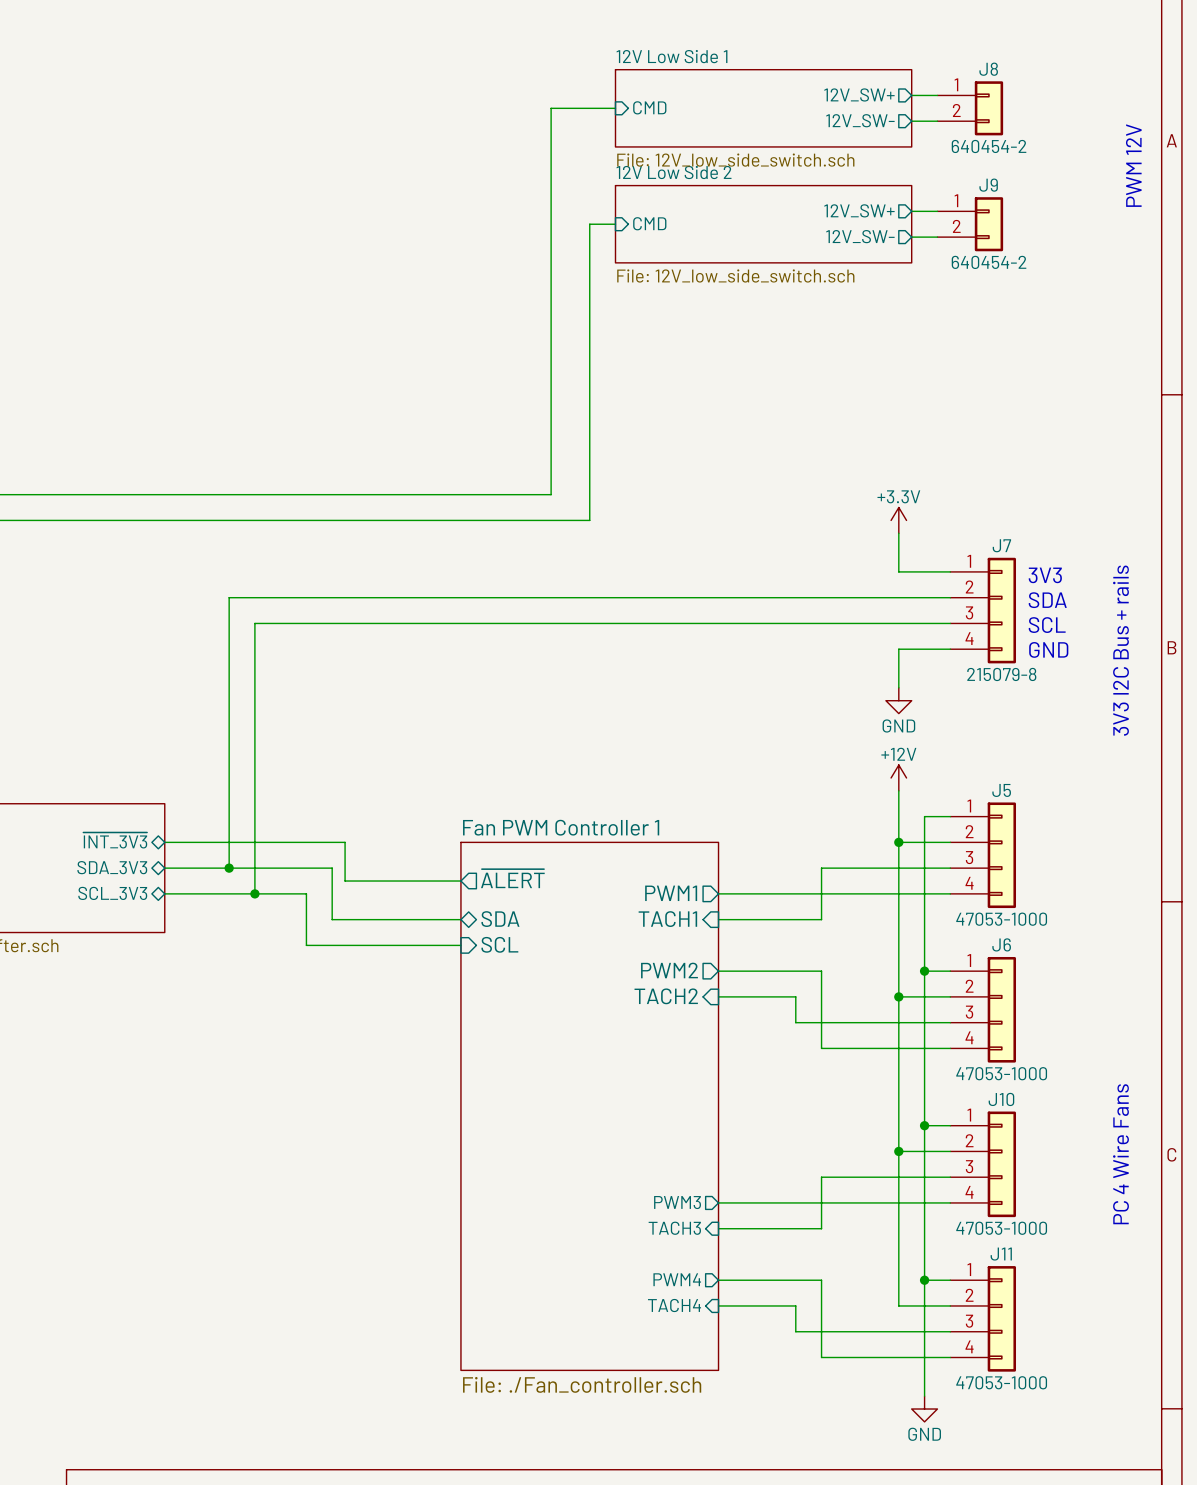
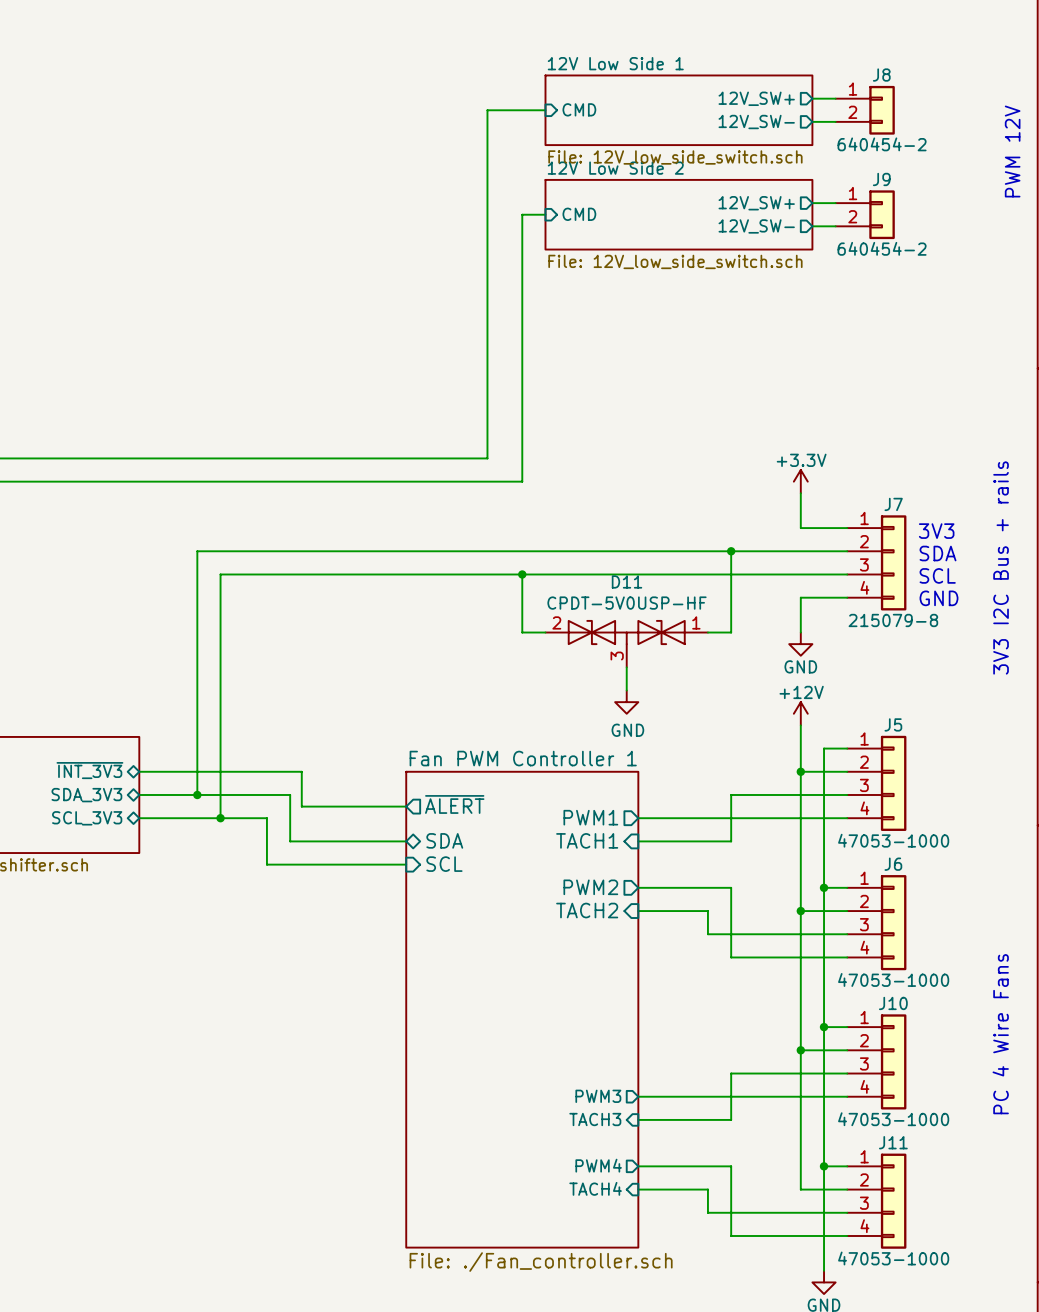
wire: none -> (731, 551) (731, 632) (707, 632)
junction: none -> (731, 551)
wire: none -> (522, 574) (522, 632) (545, 632)
junction: none -> (522, 574)
D11: none -> CPDT-5V0USP-HF (626, 643)
wire: none -> (626, 667) (626, 690)
power symbol: none -> GND (626, 702)

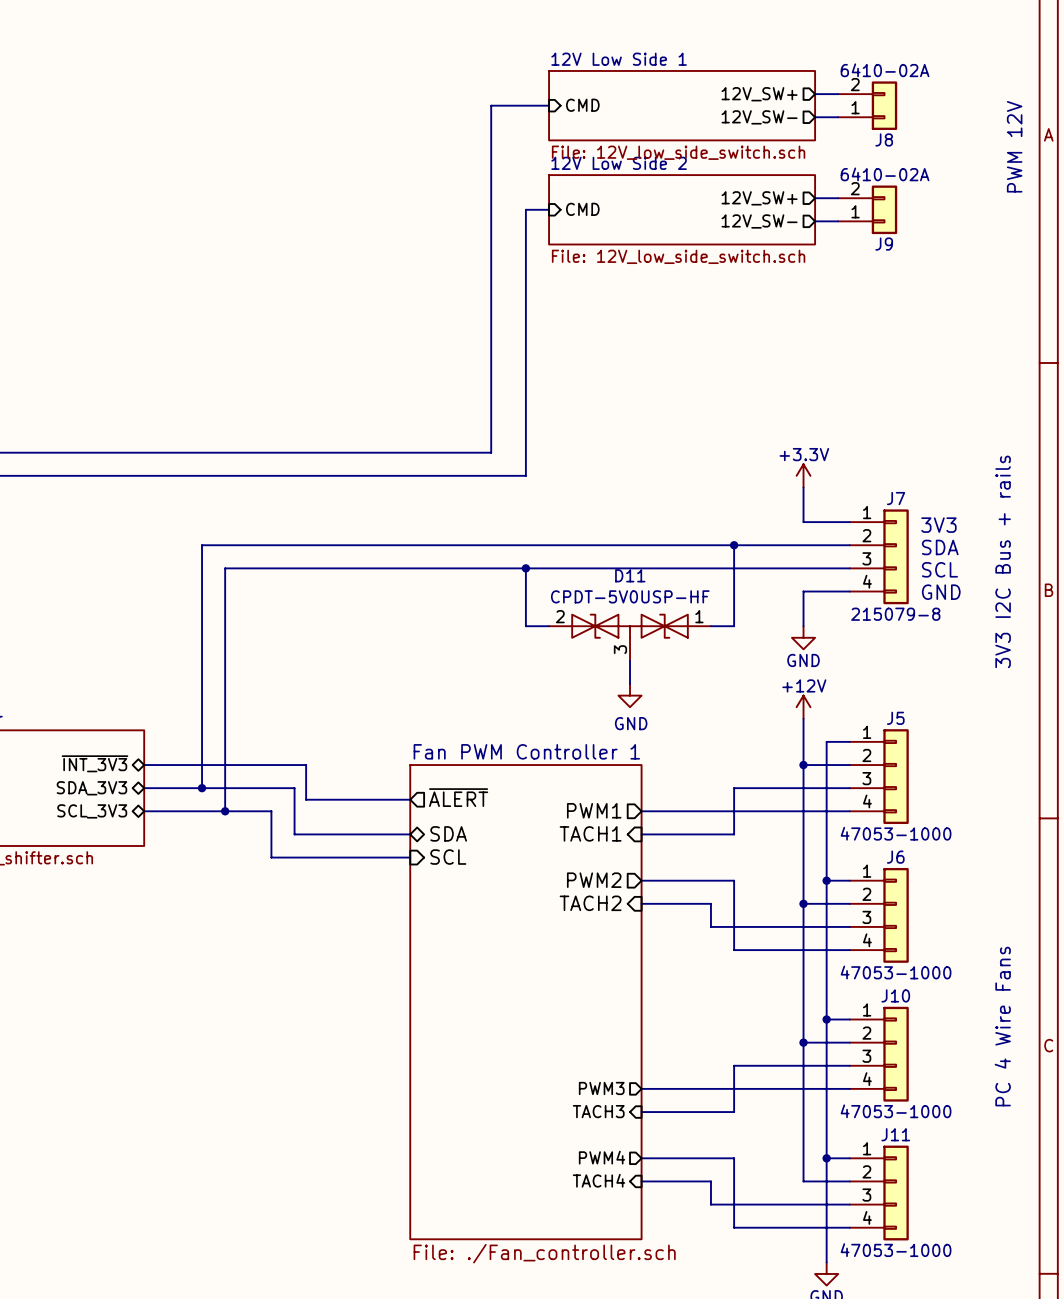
J8 flip: as is (882, 110) -> up-down (884, 105)
J8 value: 640454-2 (882, 144) -> 6410-02A (885, 70)
J9 flip: as is (882, 214) -> up-down (884, 209)
J9 value: 640454-2 (882, 248) -> 6410-02A (885, 174)

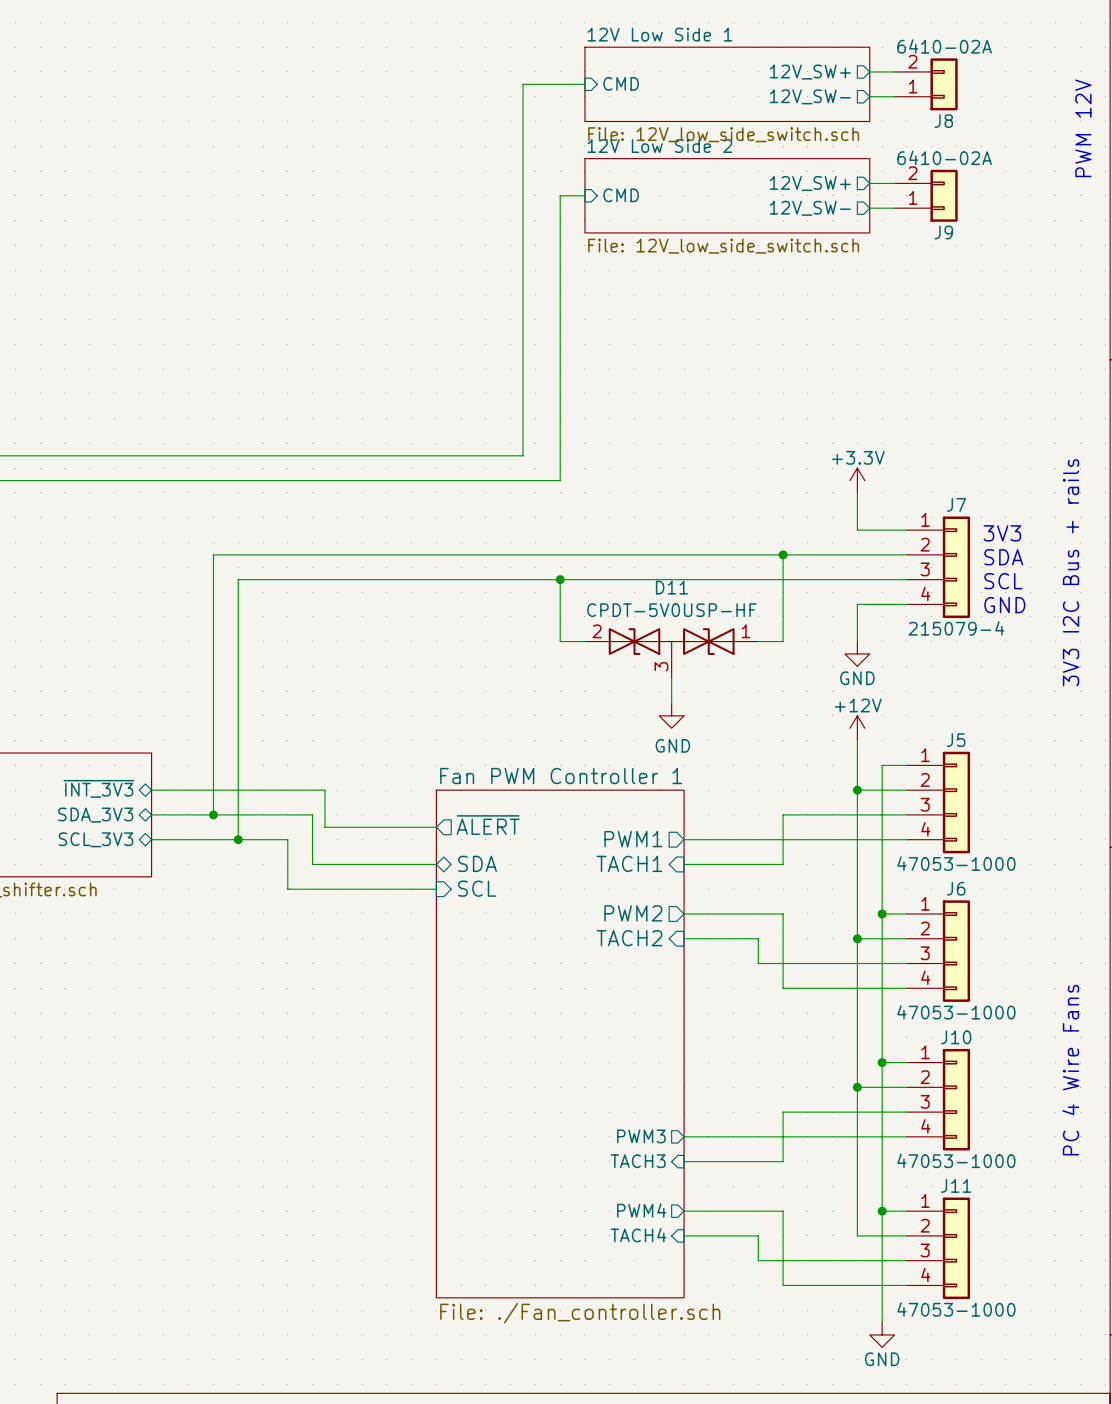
J7 value: 215079-8 (895, 614) -> 215079-4 (956, 628)

